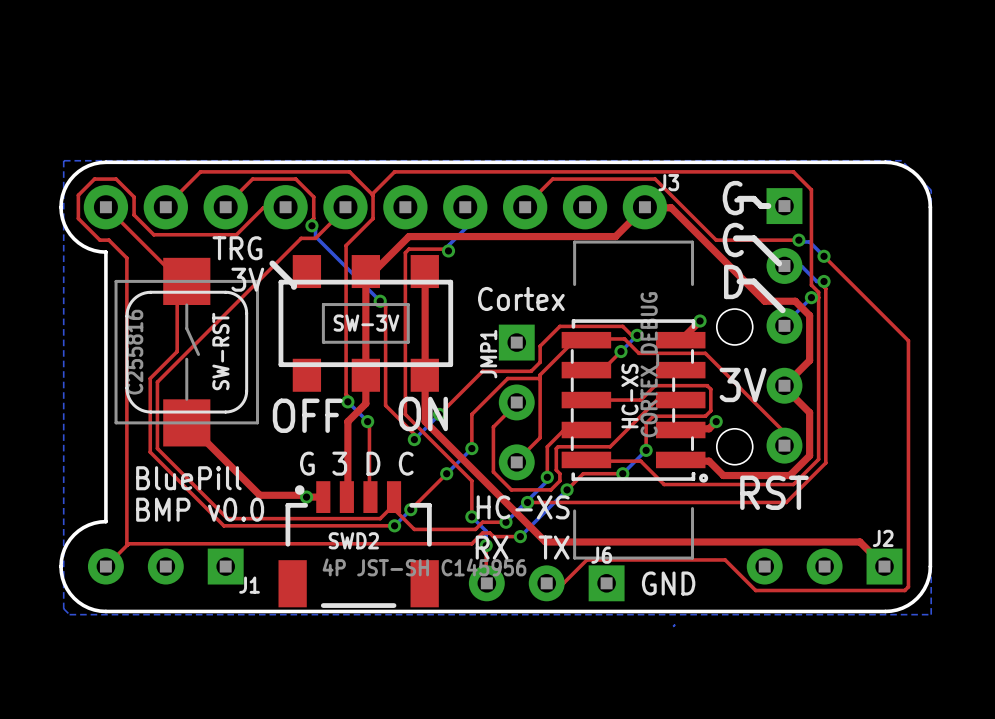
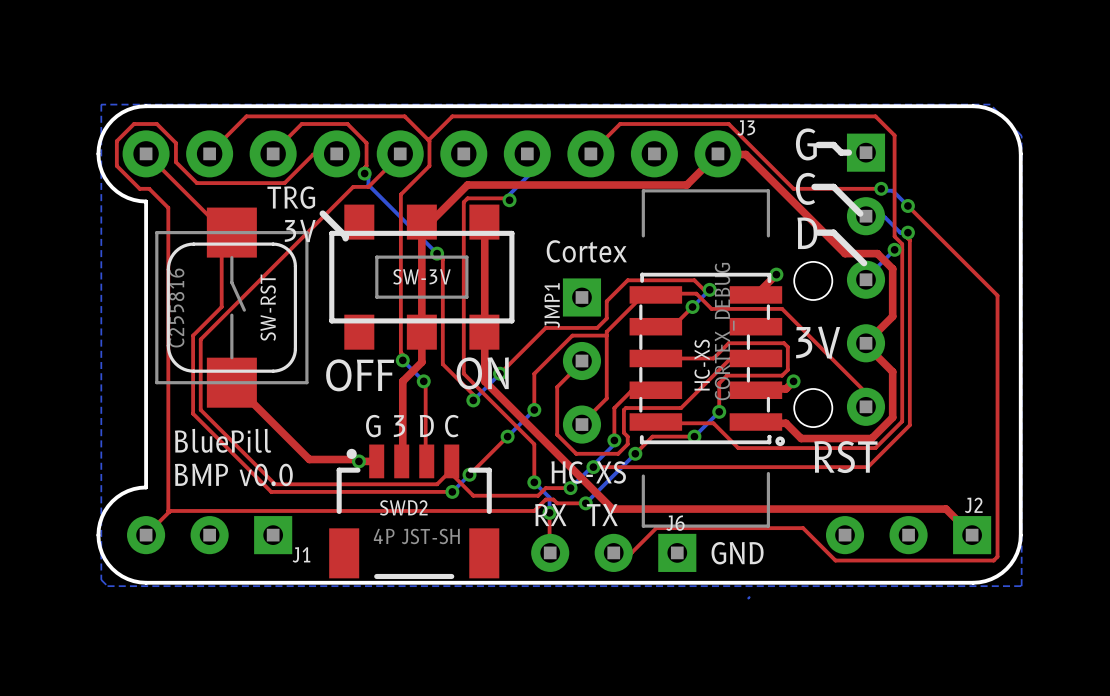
SWD2 value: 4P JST-SH C145956 (424, 567) -> 4P JST-SH (416, 536)

